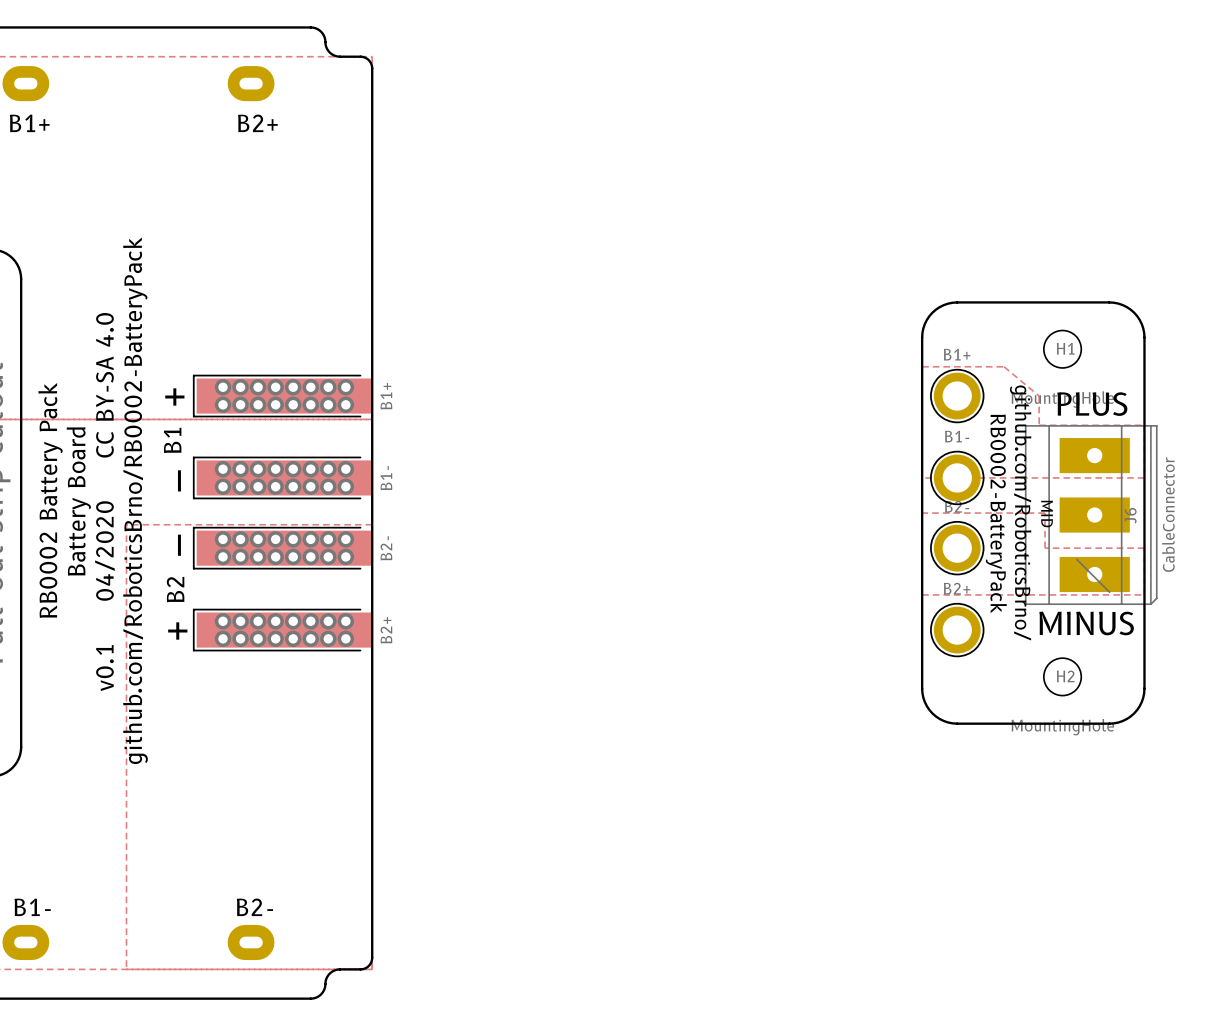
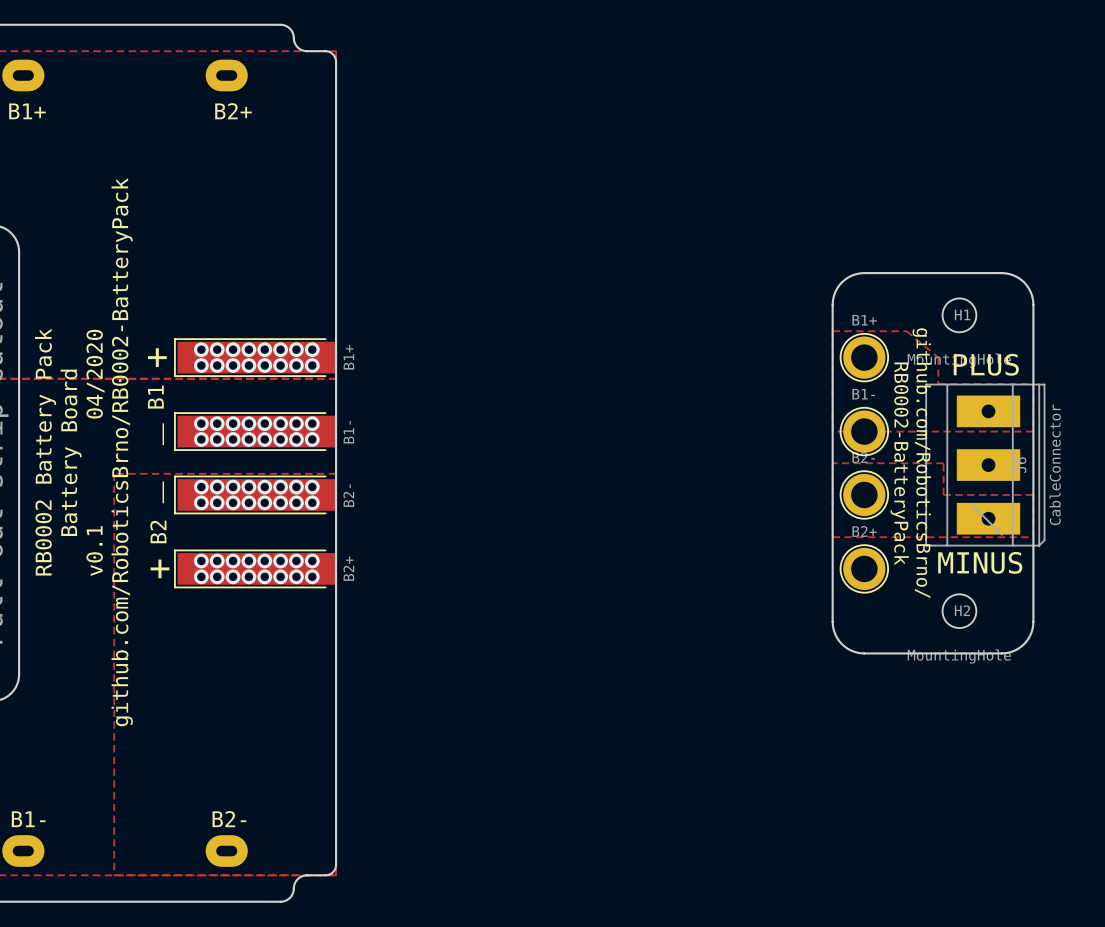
text: v0.1 04/2020 CC BY-SA 4.0 (104, 502) -> v0.1 04/2020 (95, 452)
text: MID (1047, 513) -> none

